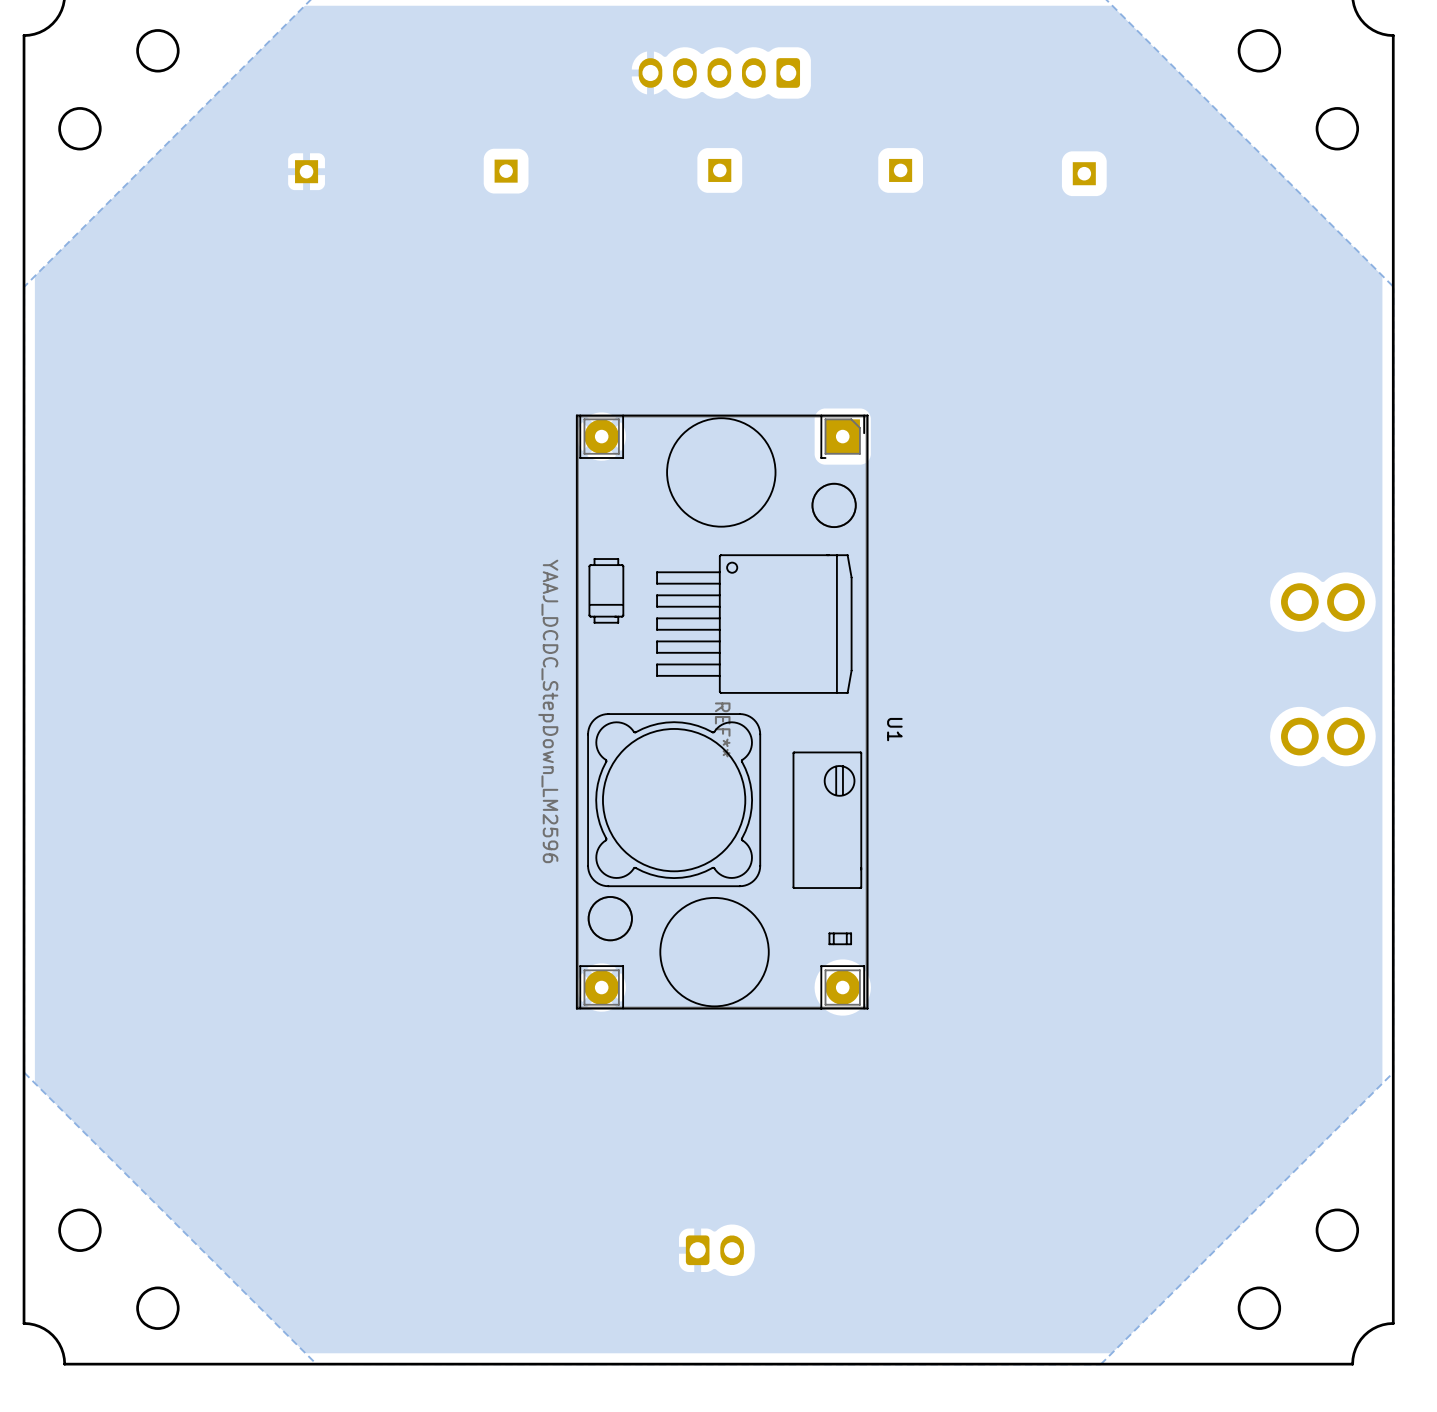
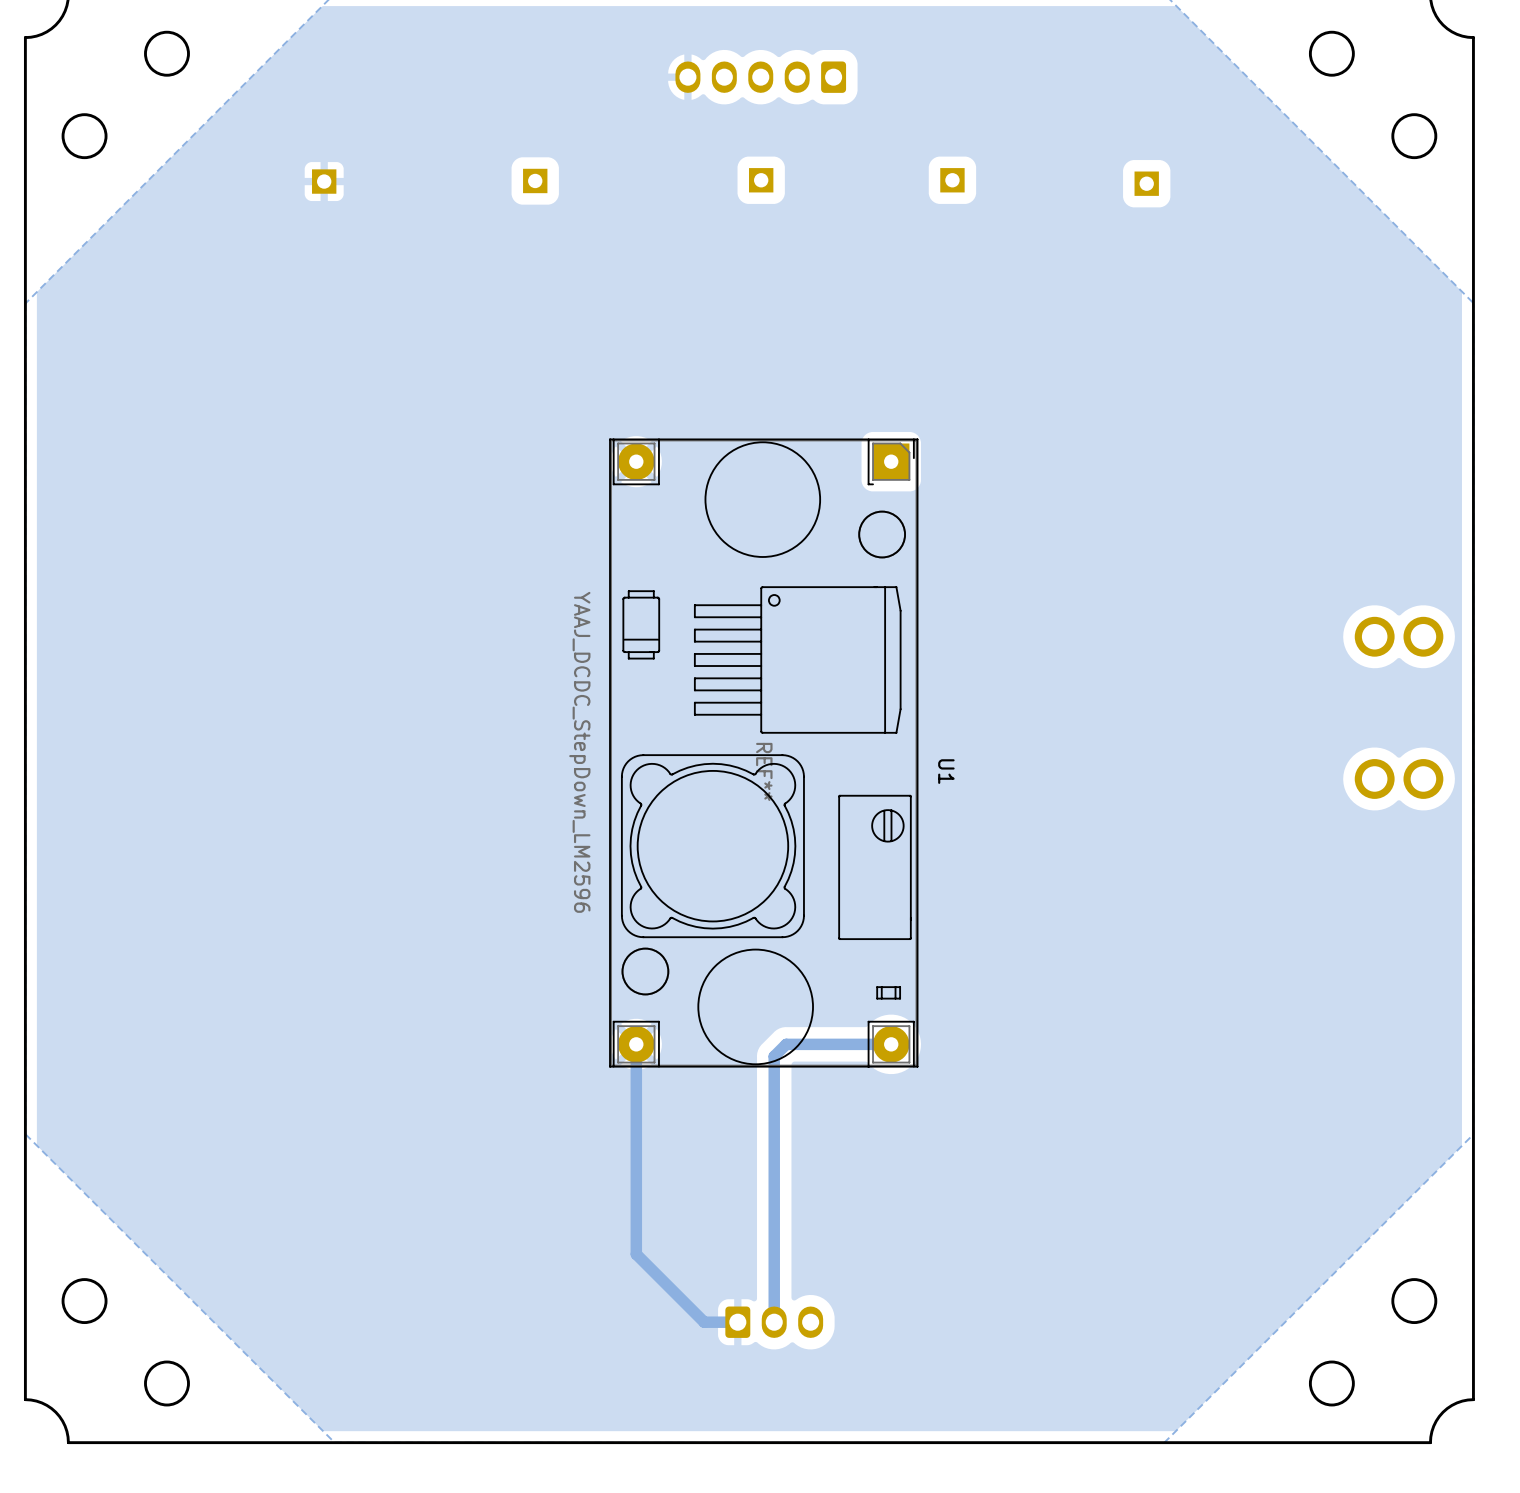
track: none -> (636, 1044) (636, 1254) (704, 1322) (737, 1322)
track: none -> (891, 1044) (786, 1044) (774, 1056) (774, 1322)
part: (714, 1250) -> none
part: none -> (774, 1322)

